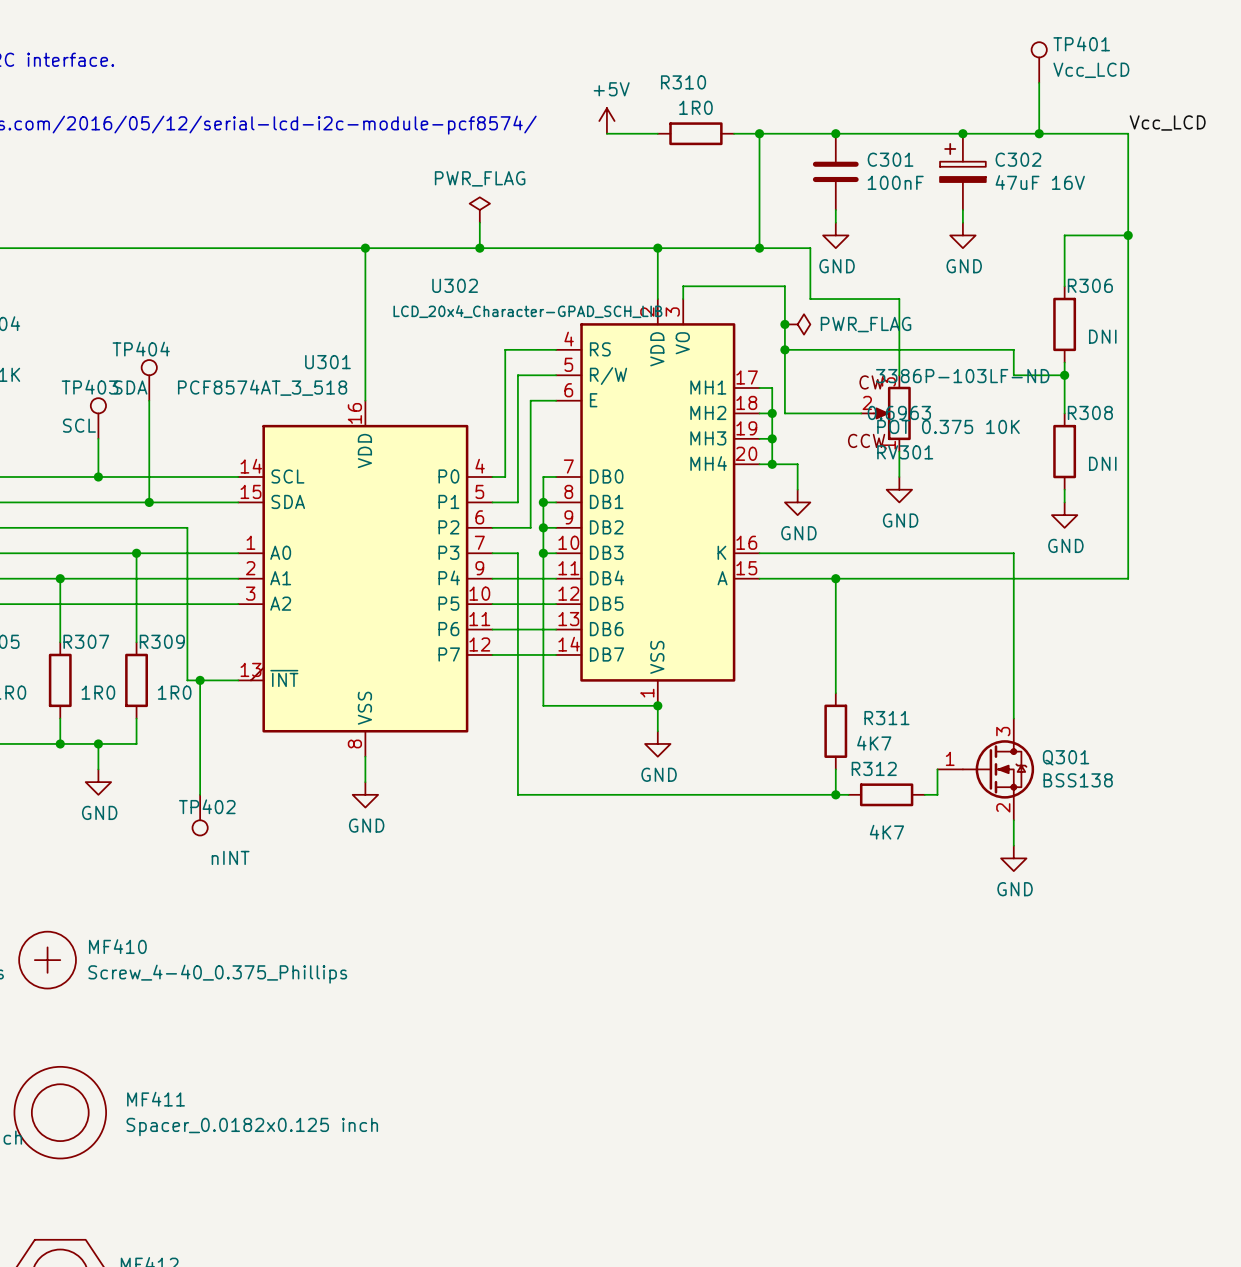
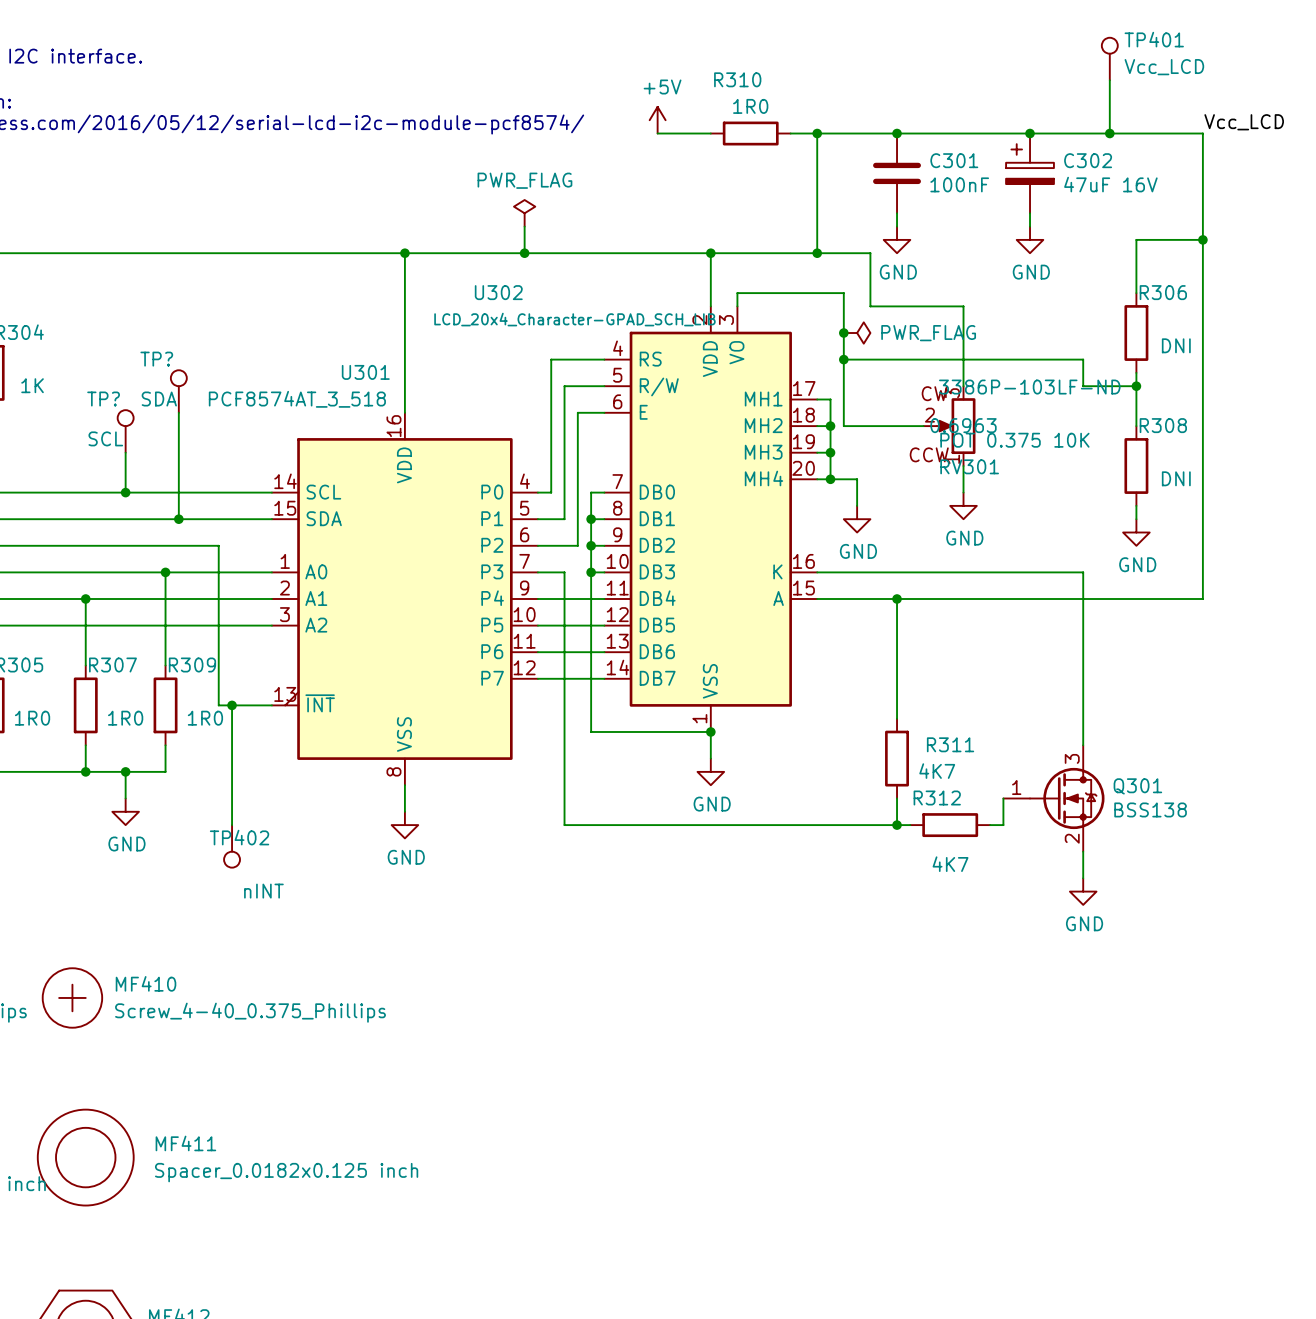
TP404 name: TP404 (141, 349) -> TP? (156, 359)
TP403 name: TP403 (90, 387) -> TP? (103, 399)

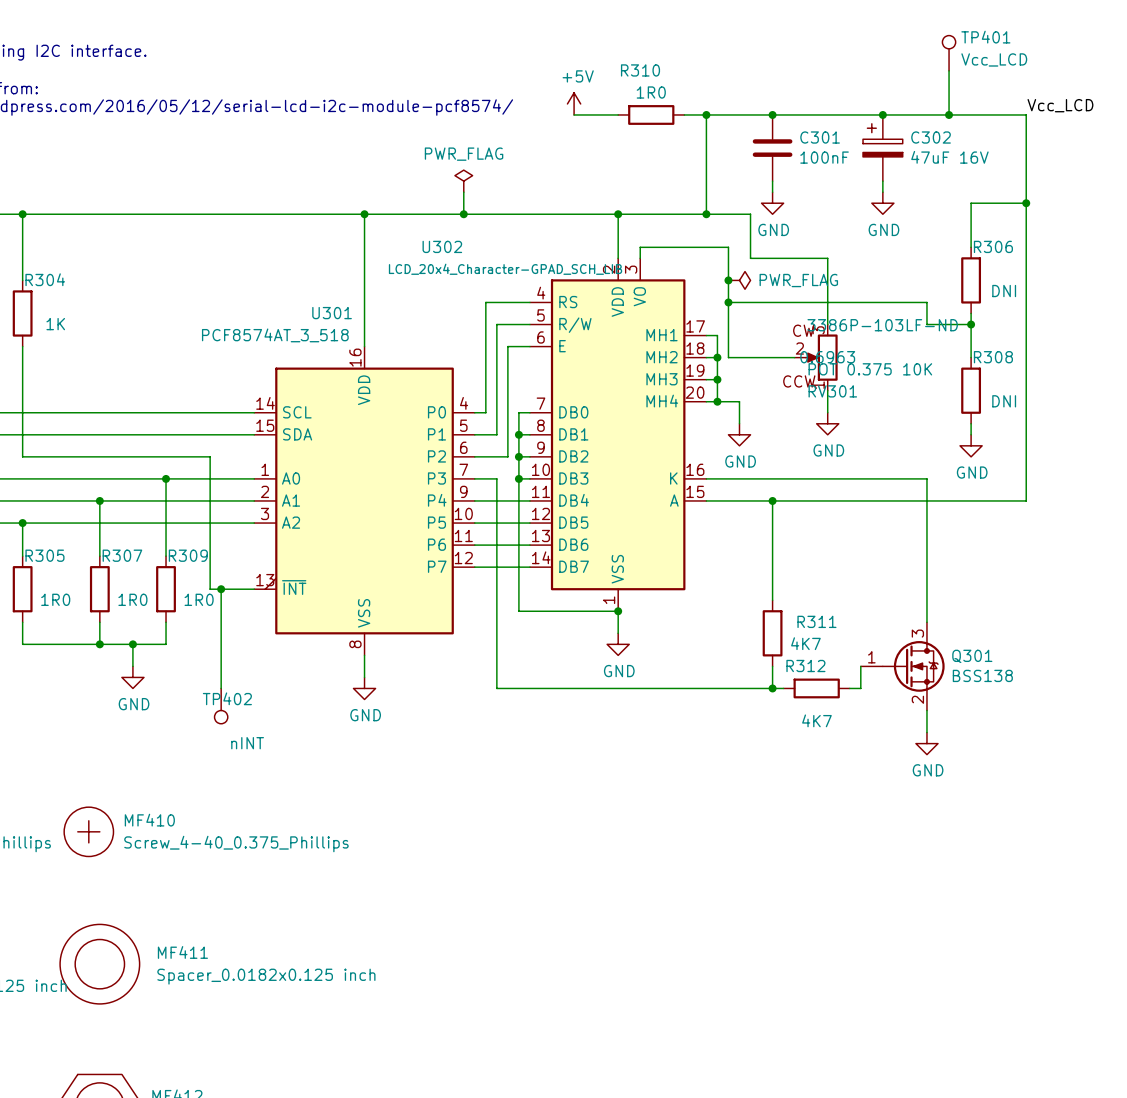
TP?: SDA (178, 391) -> none
wire: (178, 412) (178, 519) -> none
TP?: SCL (125, 431) -> none
wire: (125, 452) (125, 492) -> none
junction: (125, 492) -> none
junction: (178, 519) -> none

